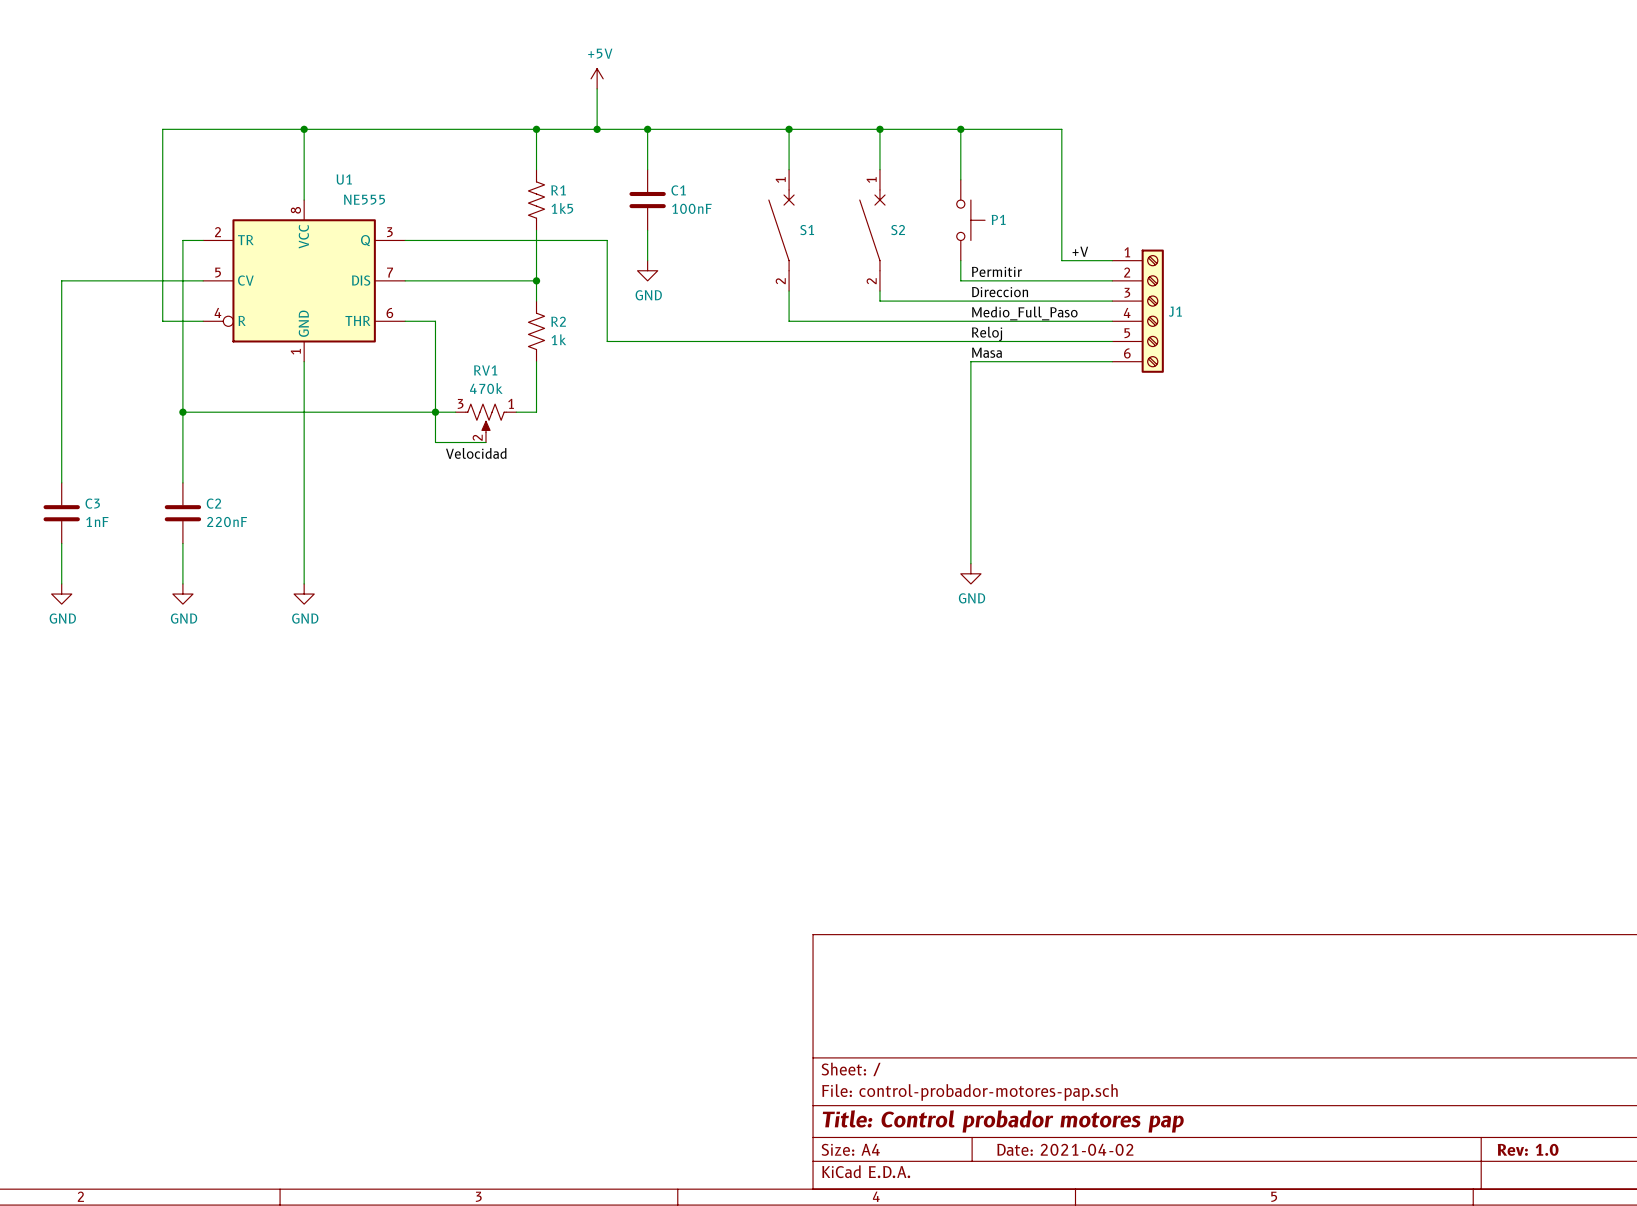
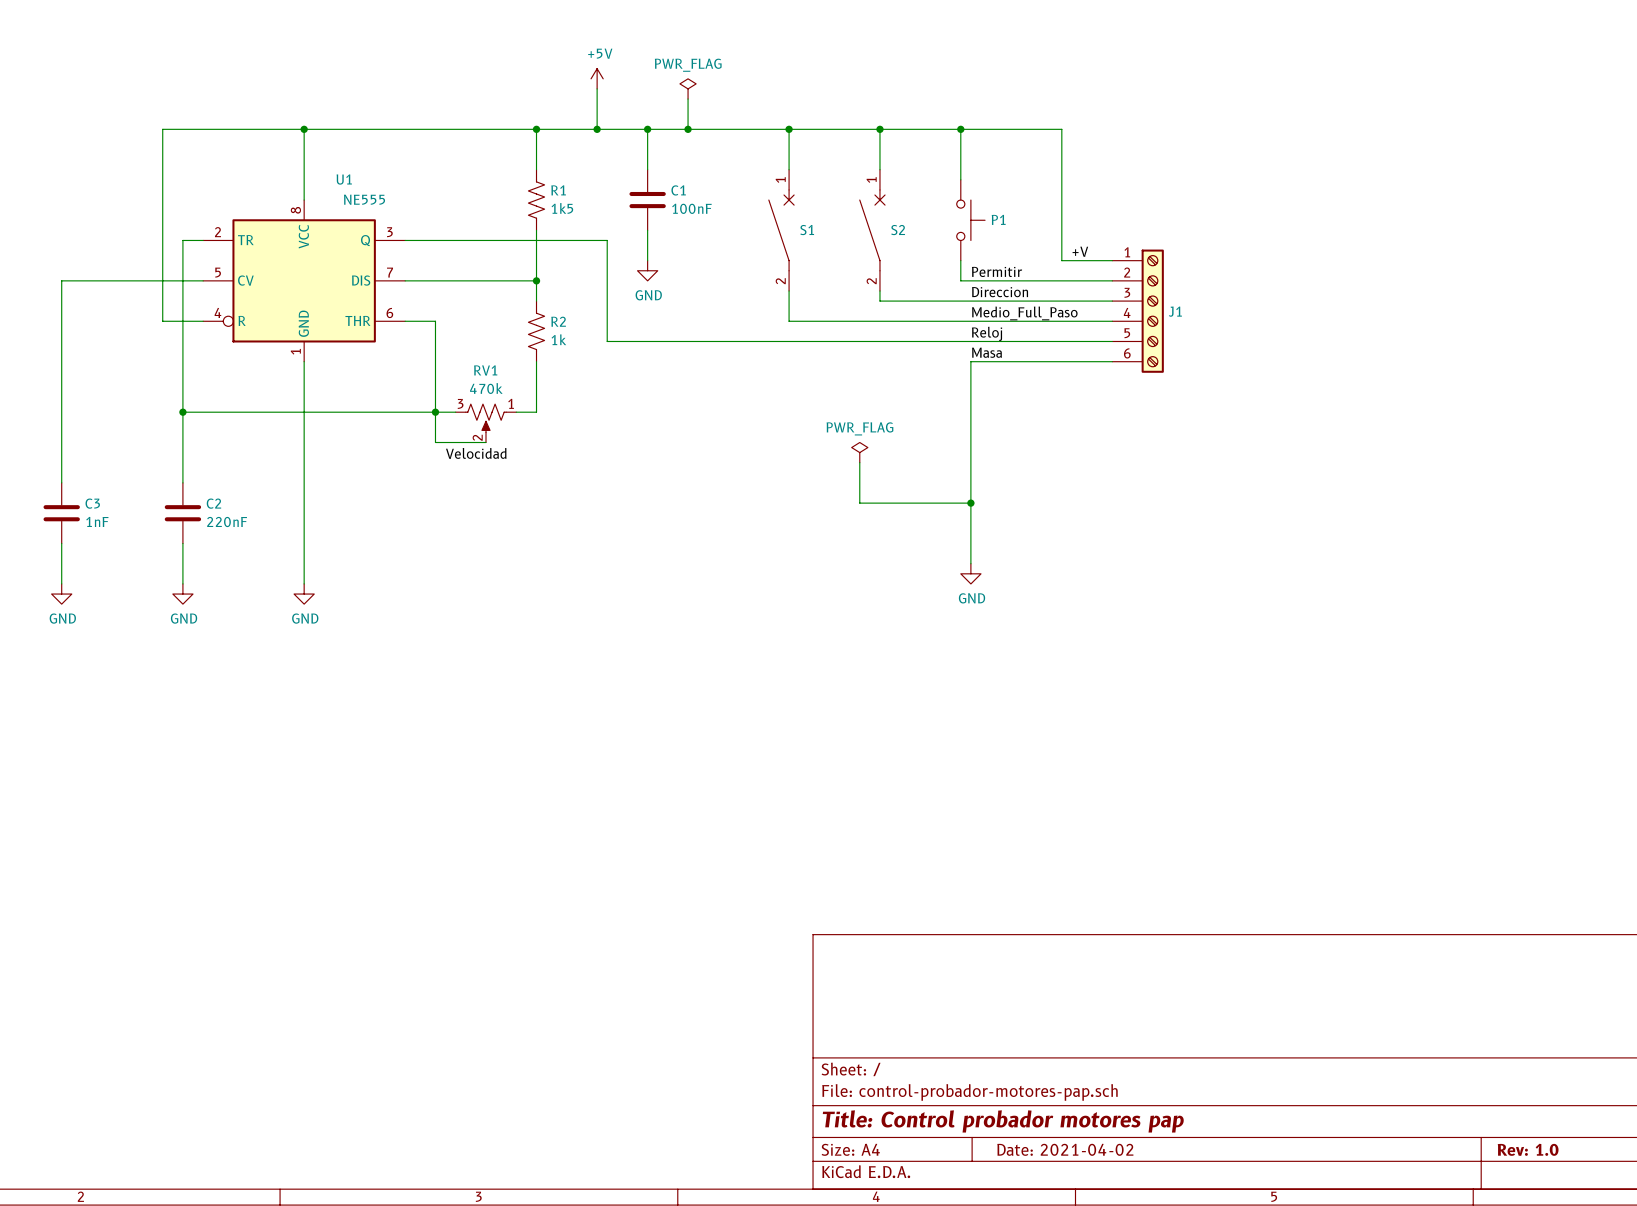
power symbol: none -> PWR_FLAG (688, 88)
wire: none -> (688, 99) (688, 129)
junction: none -> (688, 129)
power symbol: none -> PWR_FLAG (859, 452)
wire: none -> (859, 462) (859, 503) (970, 503)
junction: none -> (970, 503)

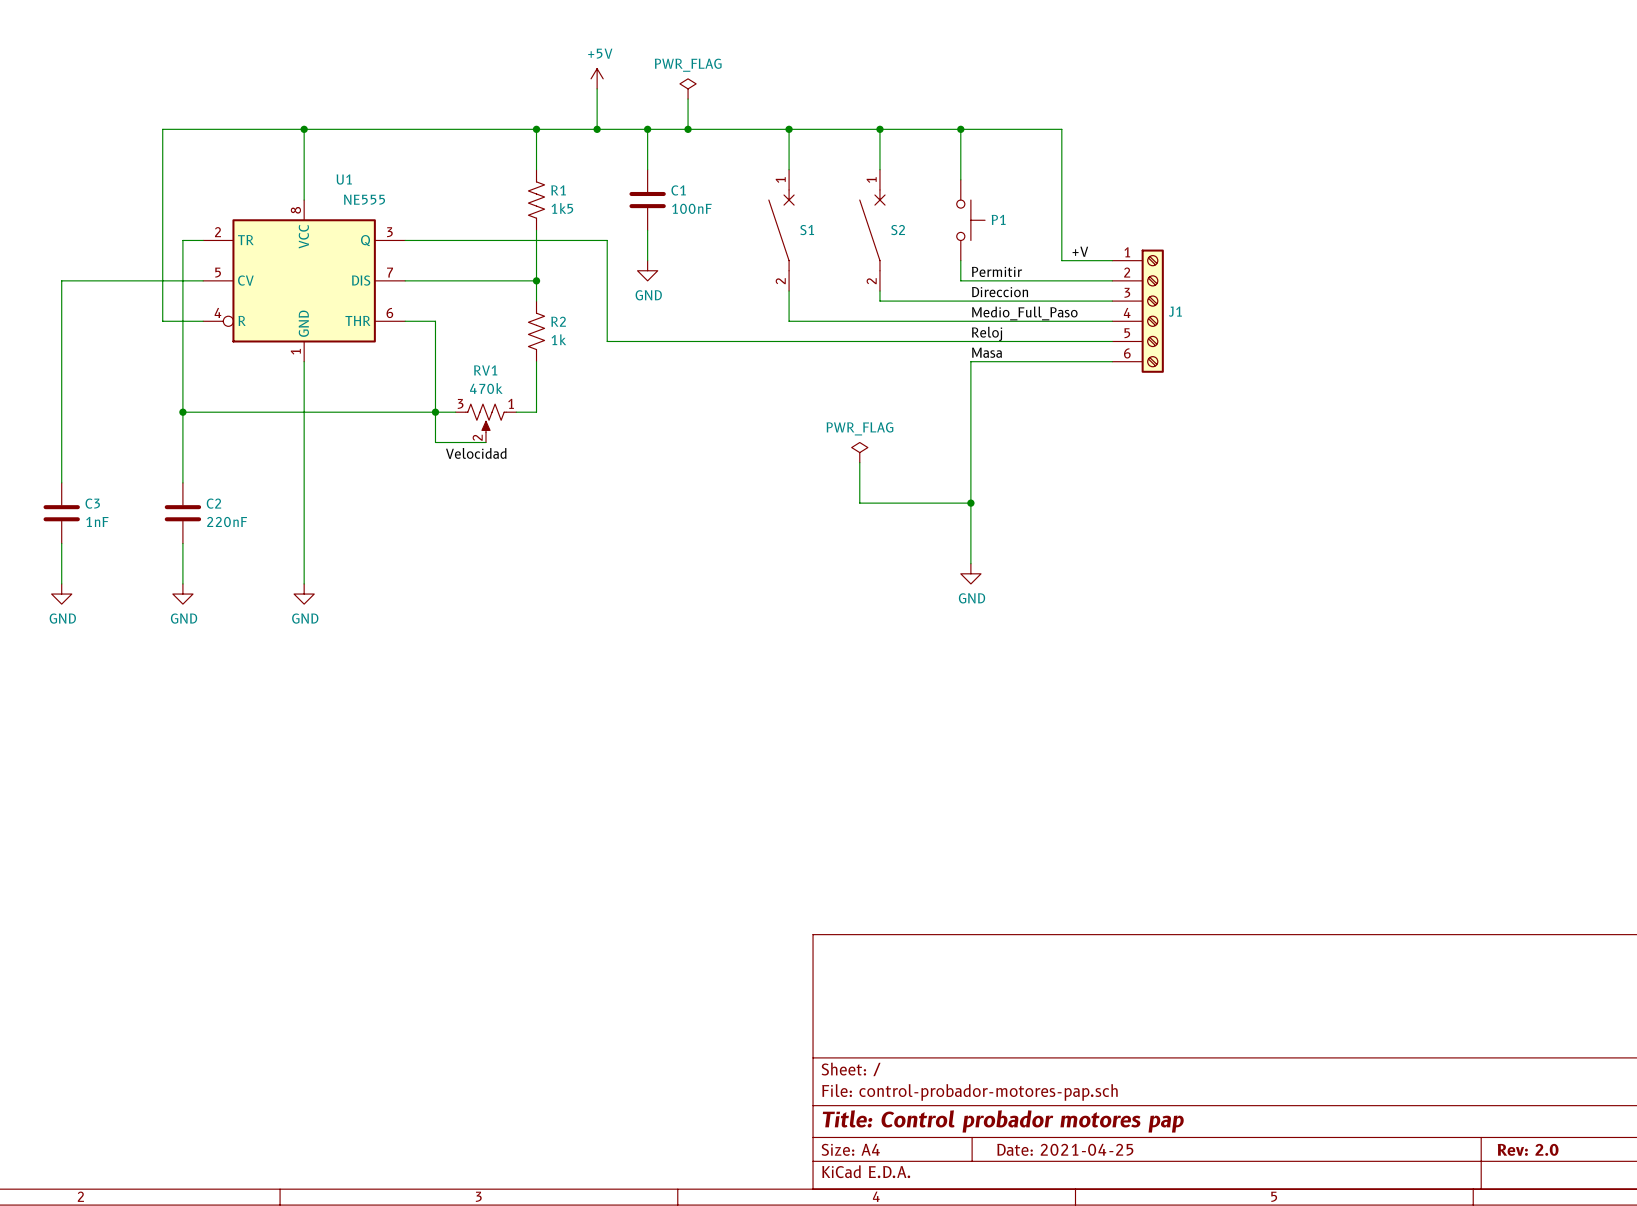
title block: Date: 2021-04-02 (1065, 1149) -> Date: 2021-04-25 (1065, 1149)
title block: Rev: 1.0 (1528, 1149) -> Rev: 2.0 (1528, 1149)

